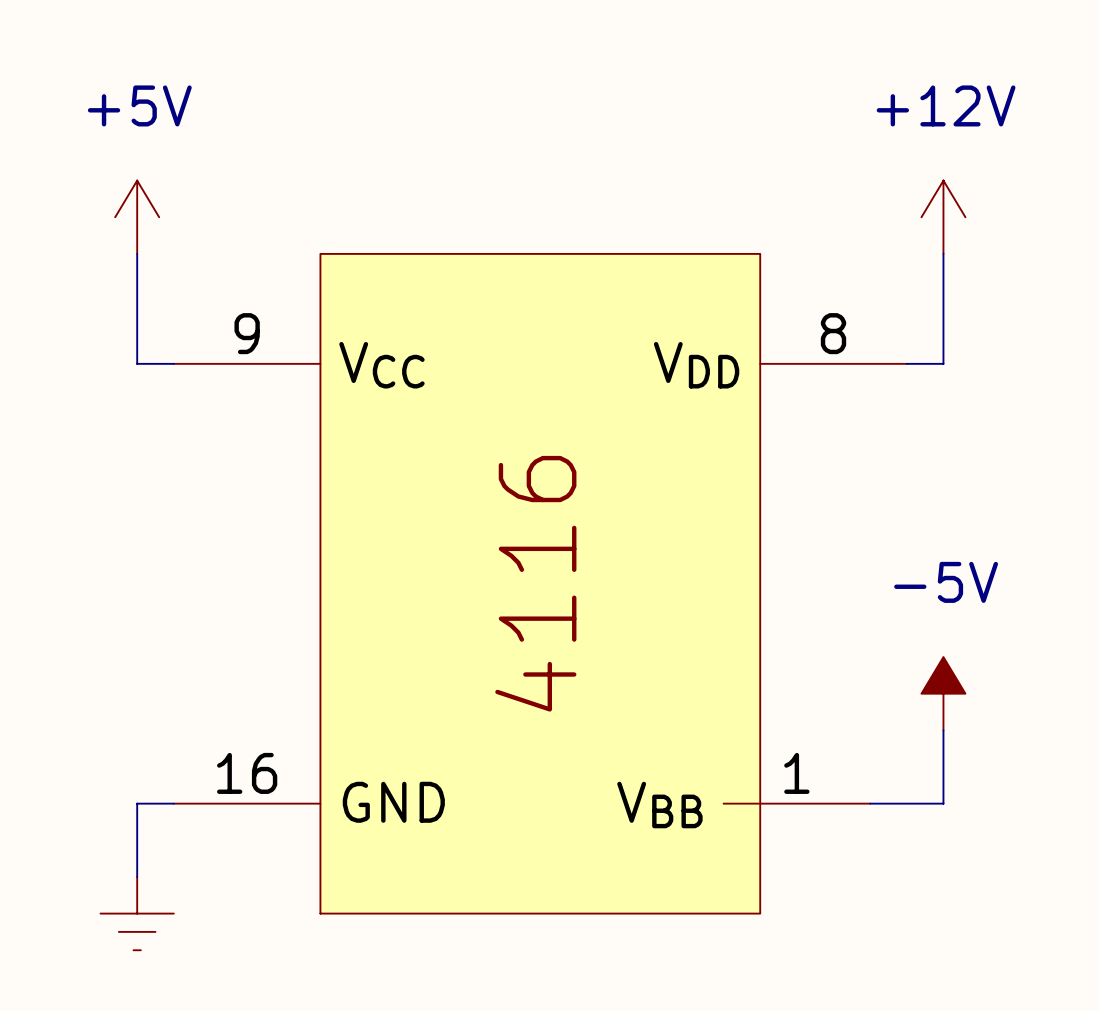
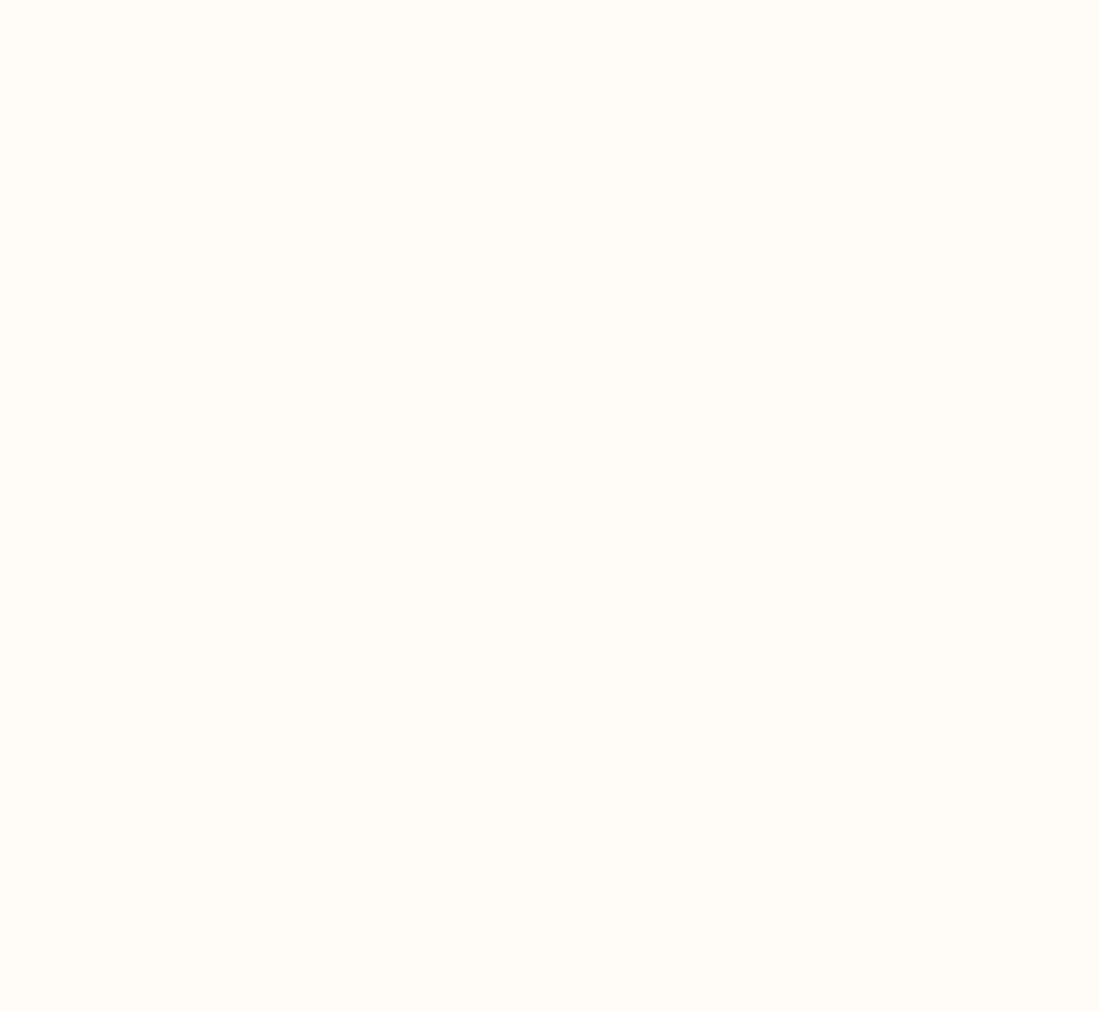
power symbol: +5V (137, 217) -> none
power symbol: +12V (943, 217) -> none
wire: (137, 253) (137, 363) (173, 363) -> none
wire: (943, 253) (943, 363) (906, 363) -> none
part: (540, 583) -> none
power symbol: -5V (943, 693) -> none
wire: (943, 730) (943, 803) (870, 803) -> none
wire: (173, 803) (137, 803) (137, 876) -> none
power symbol: (137, 913) -> none

